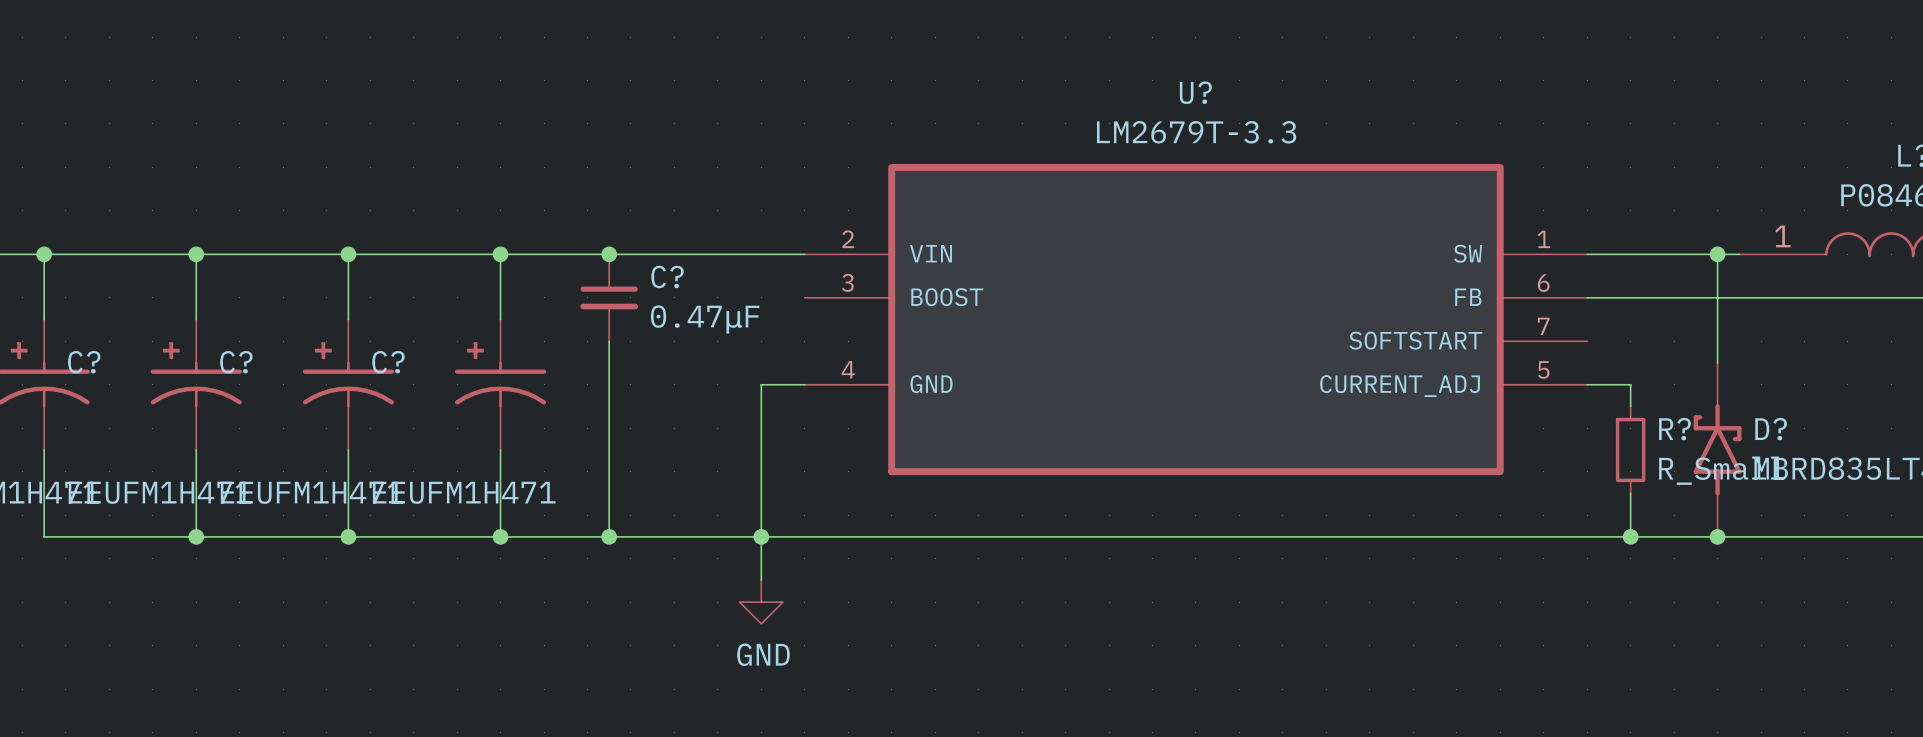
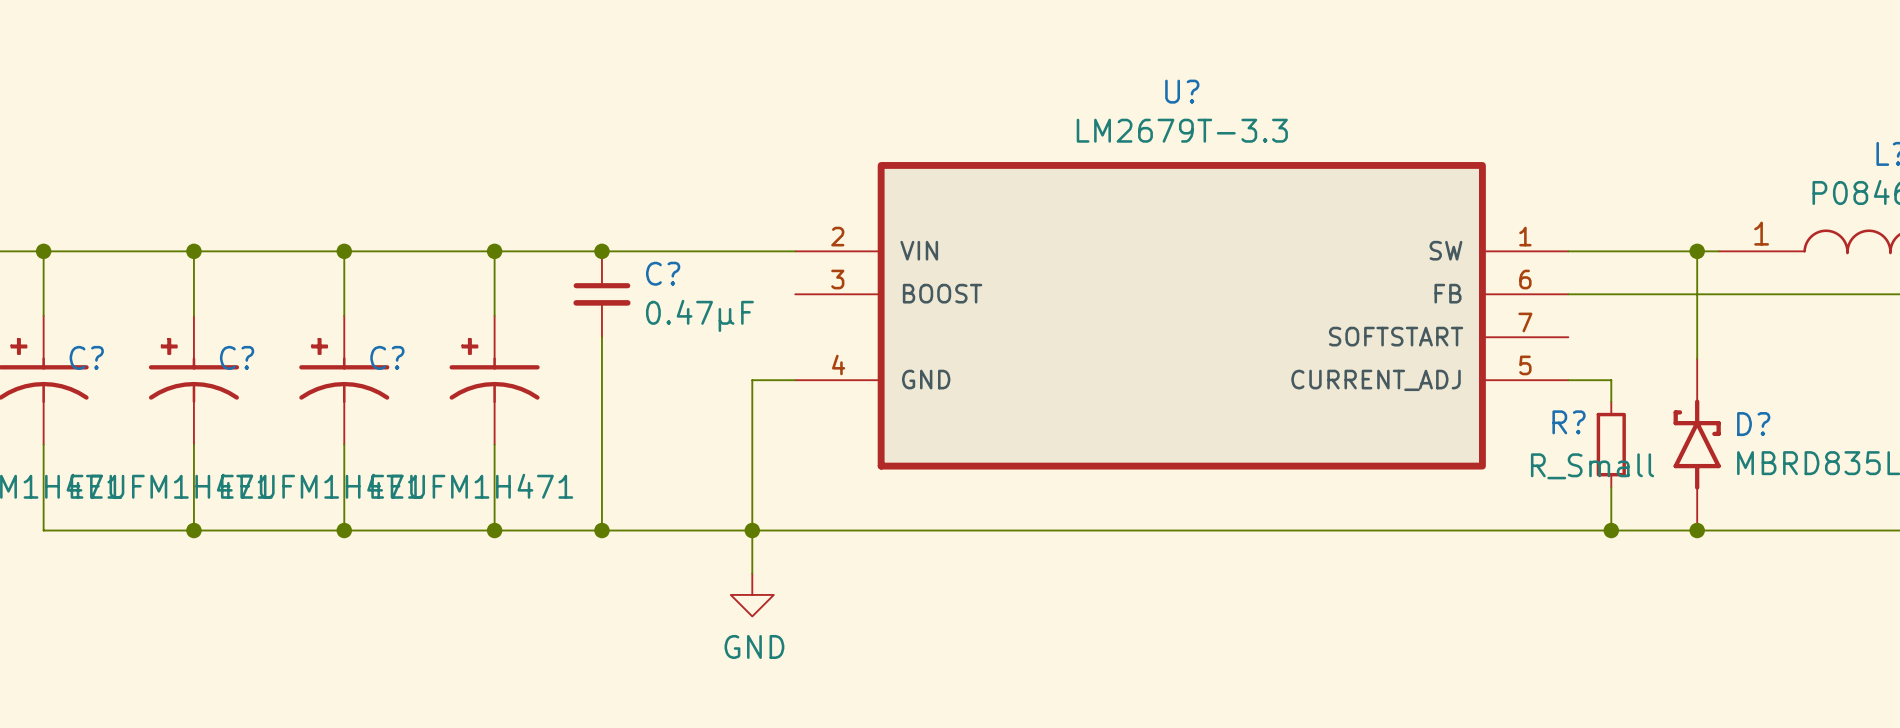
R? name position: R? (1674, 429) -> R? (1569, 422)
R? value position: R_Small (1721, 470) -> R_Small (1592, 466)

